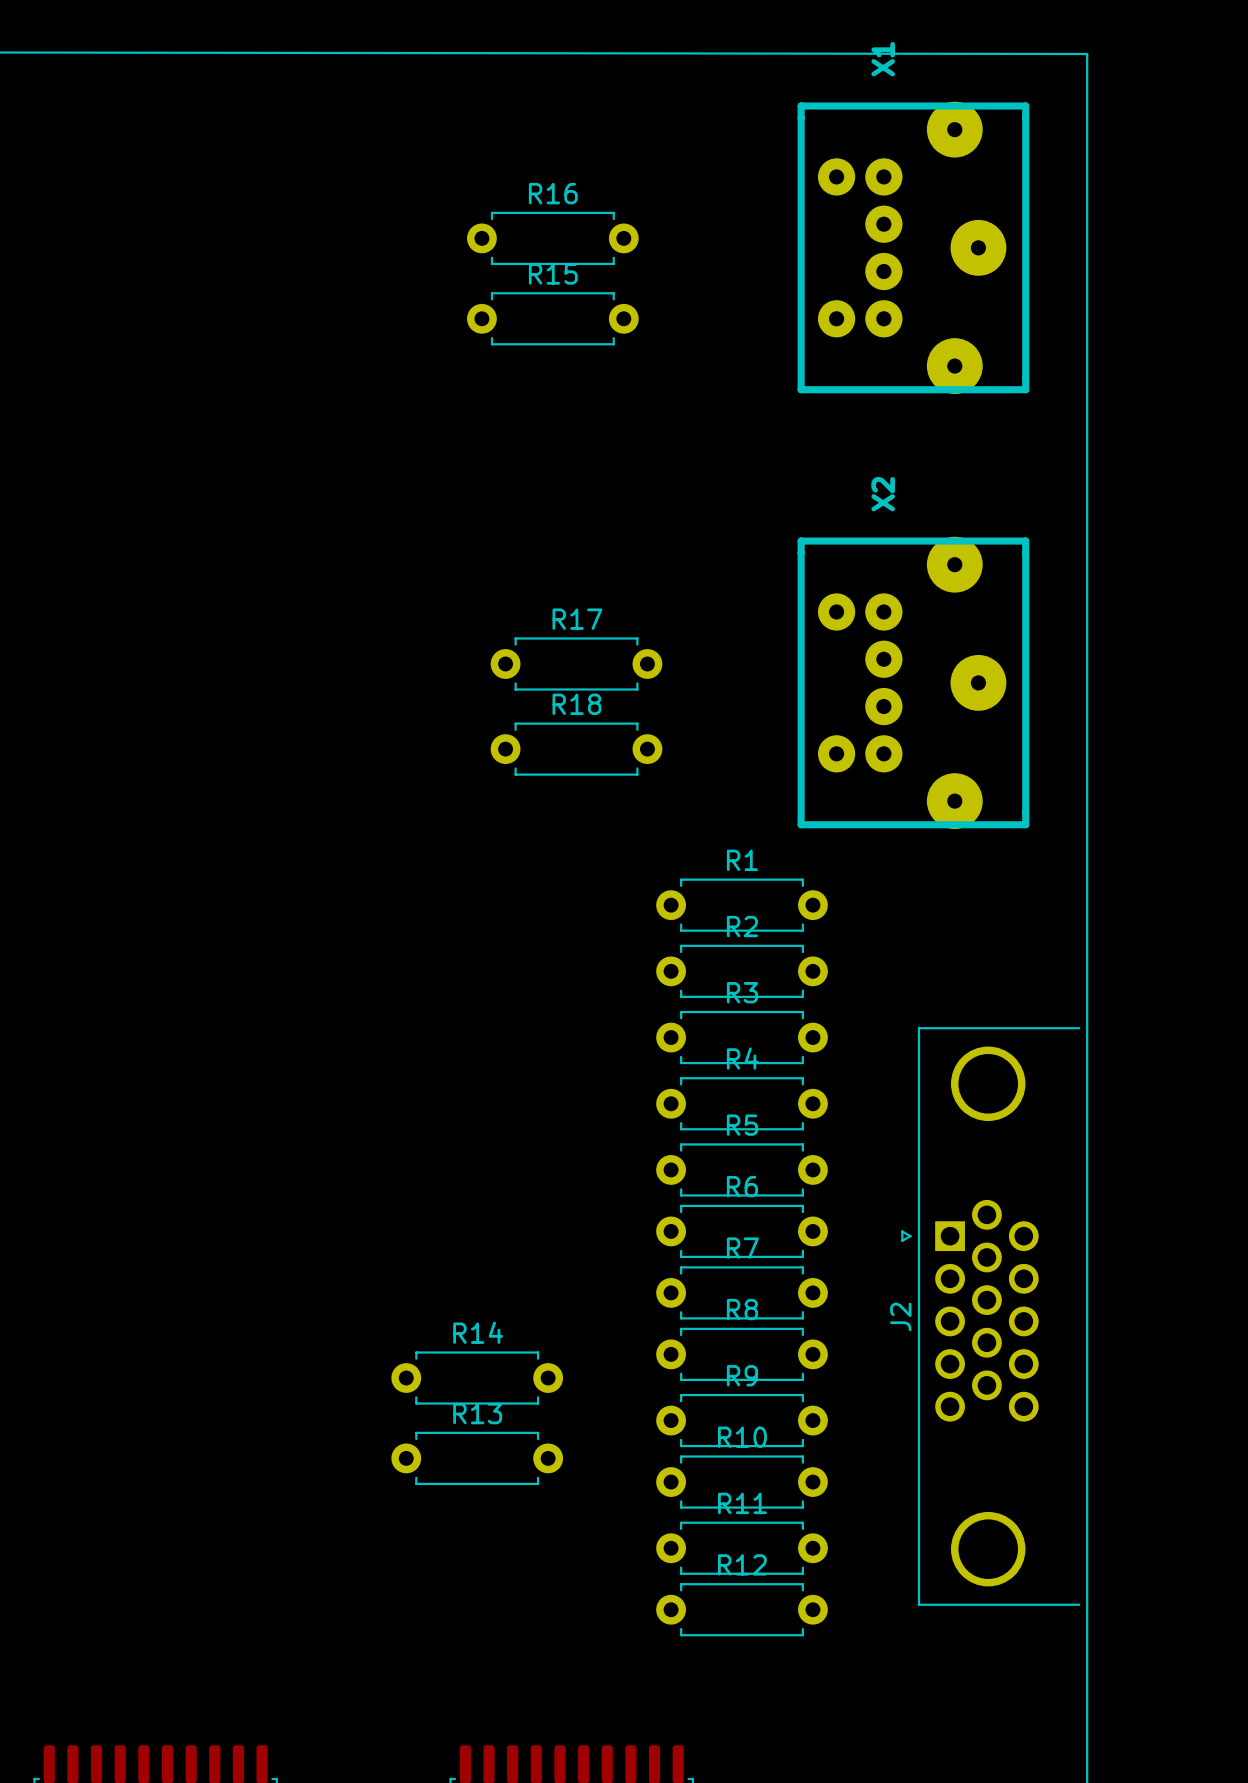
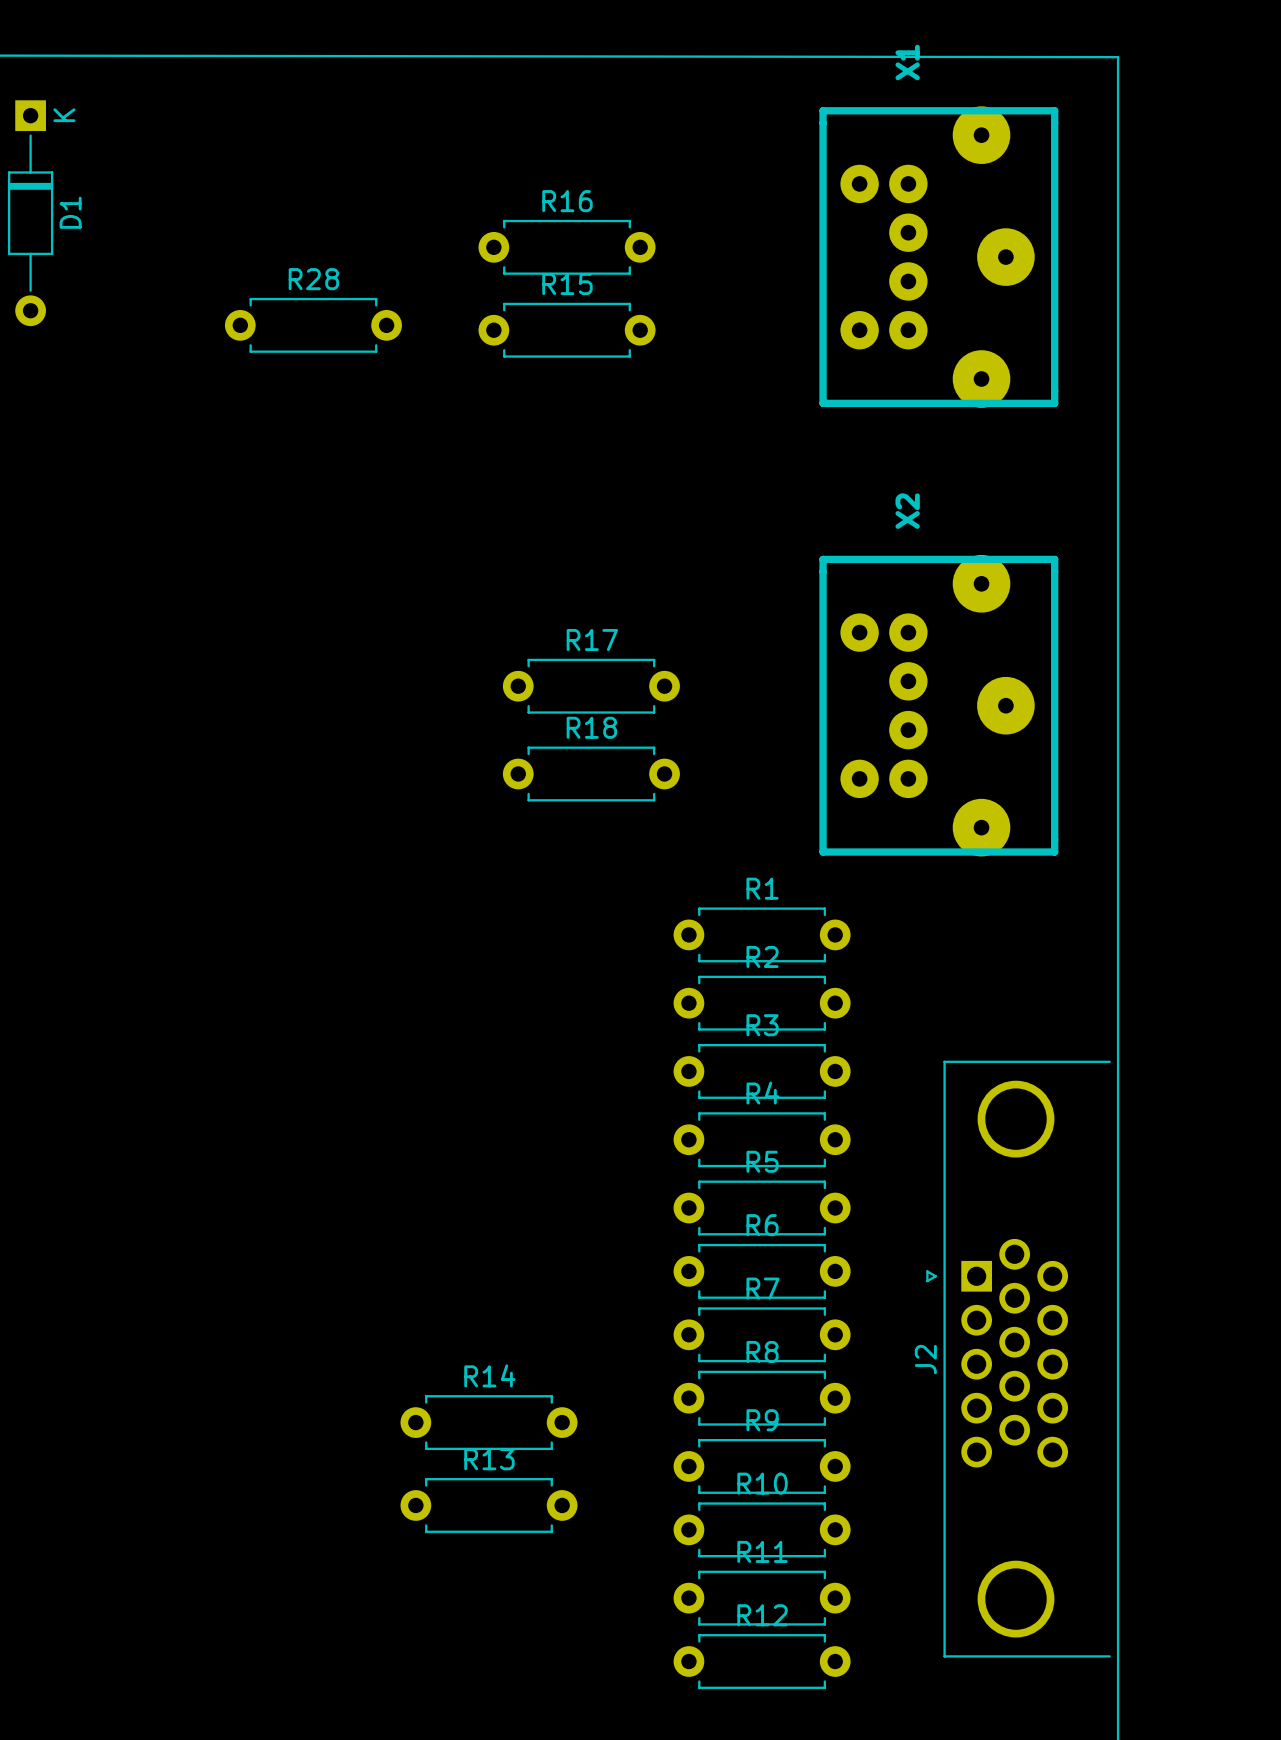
D1: none -> (30, 213)
R28: none -> (313, 325)

